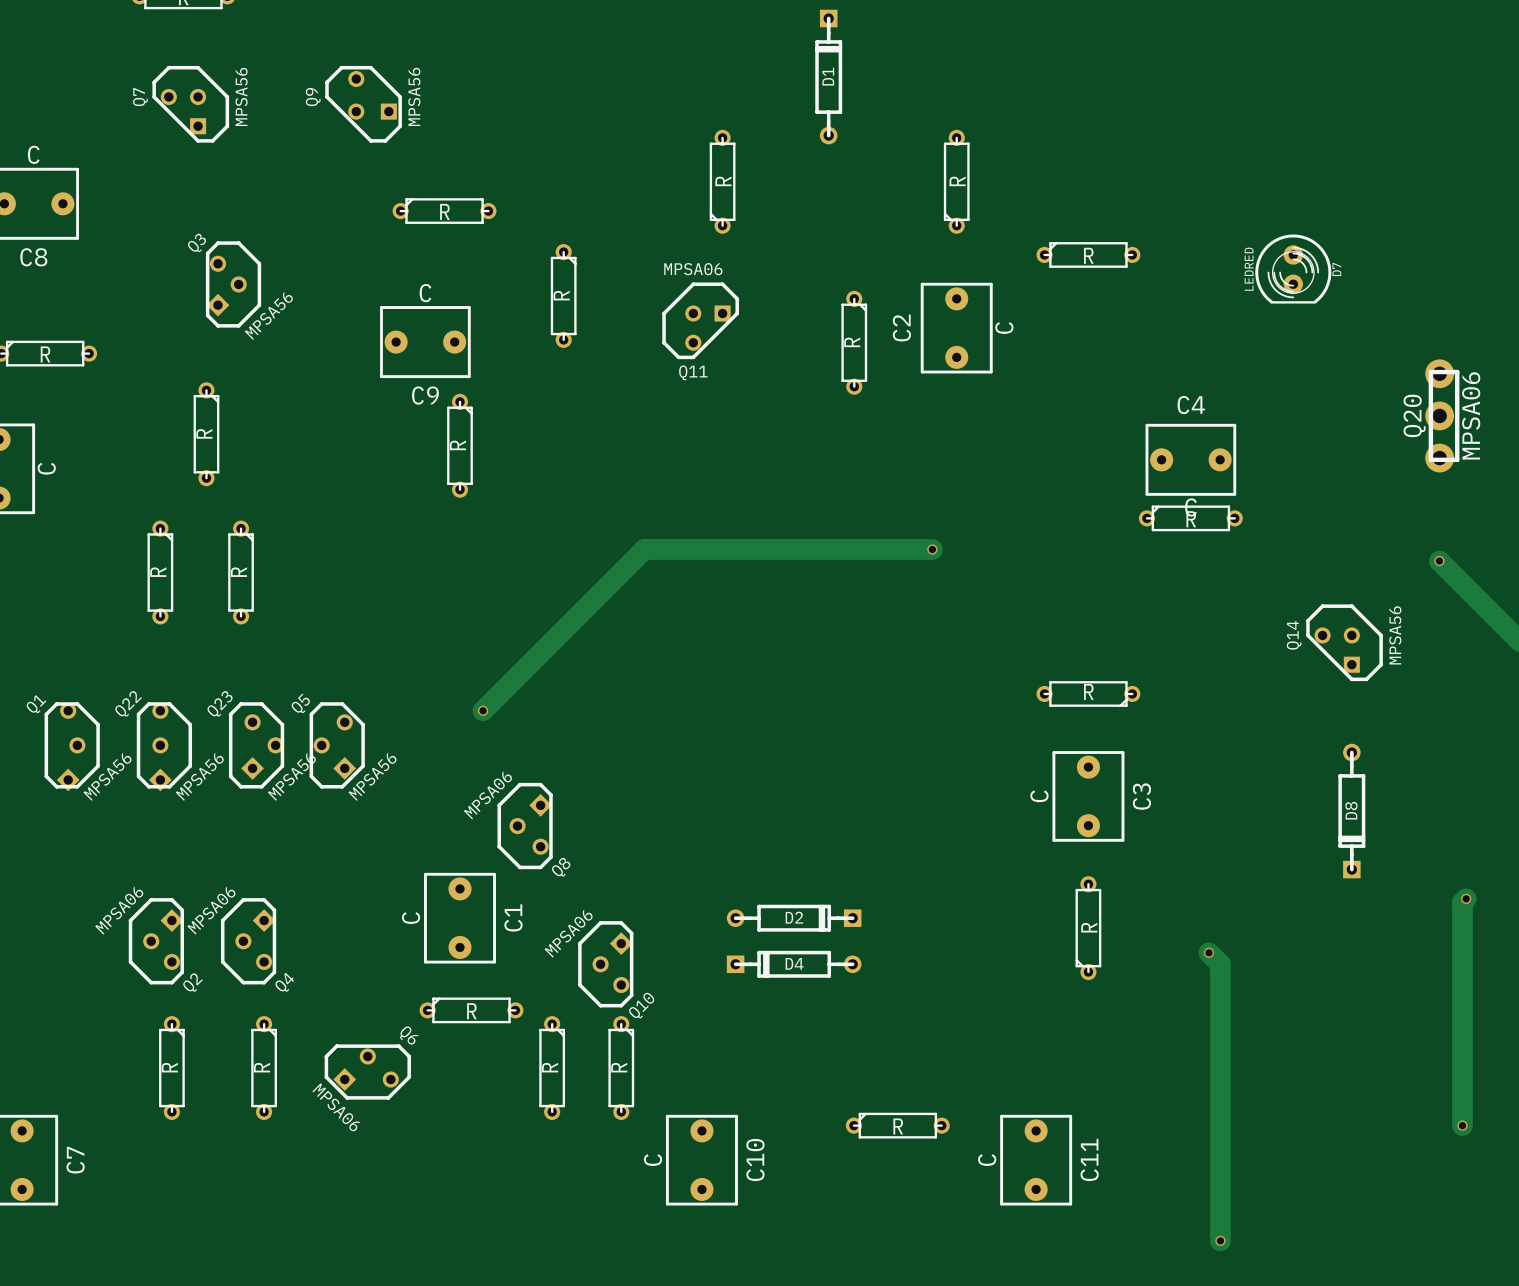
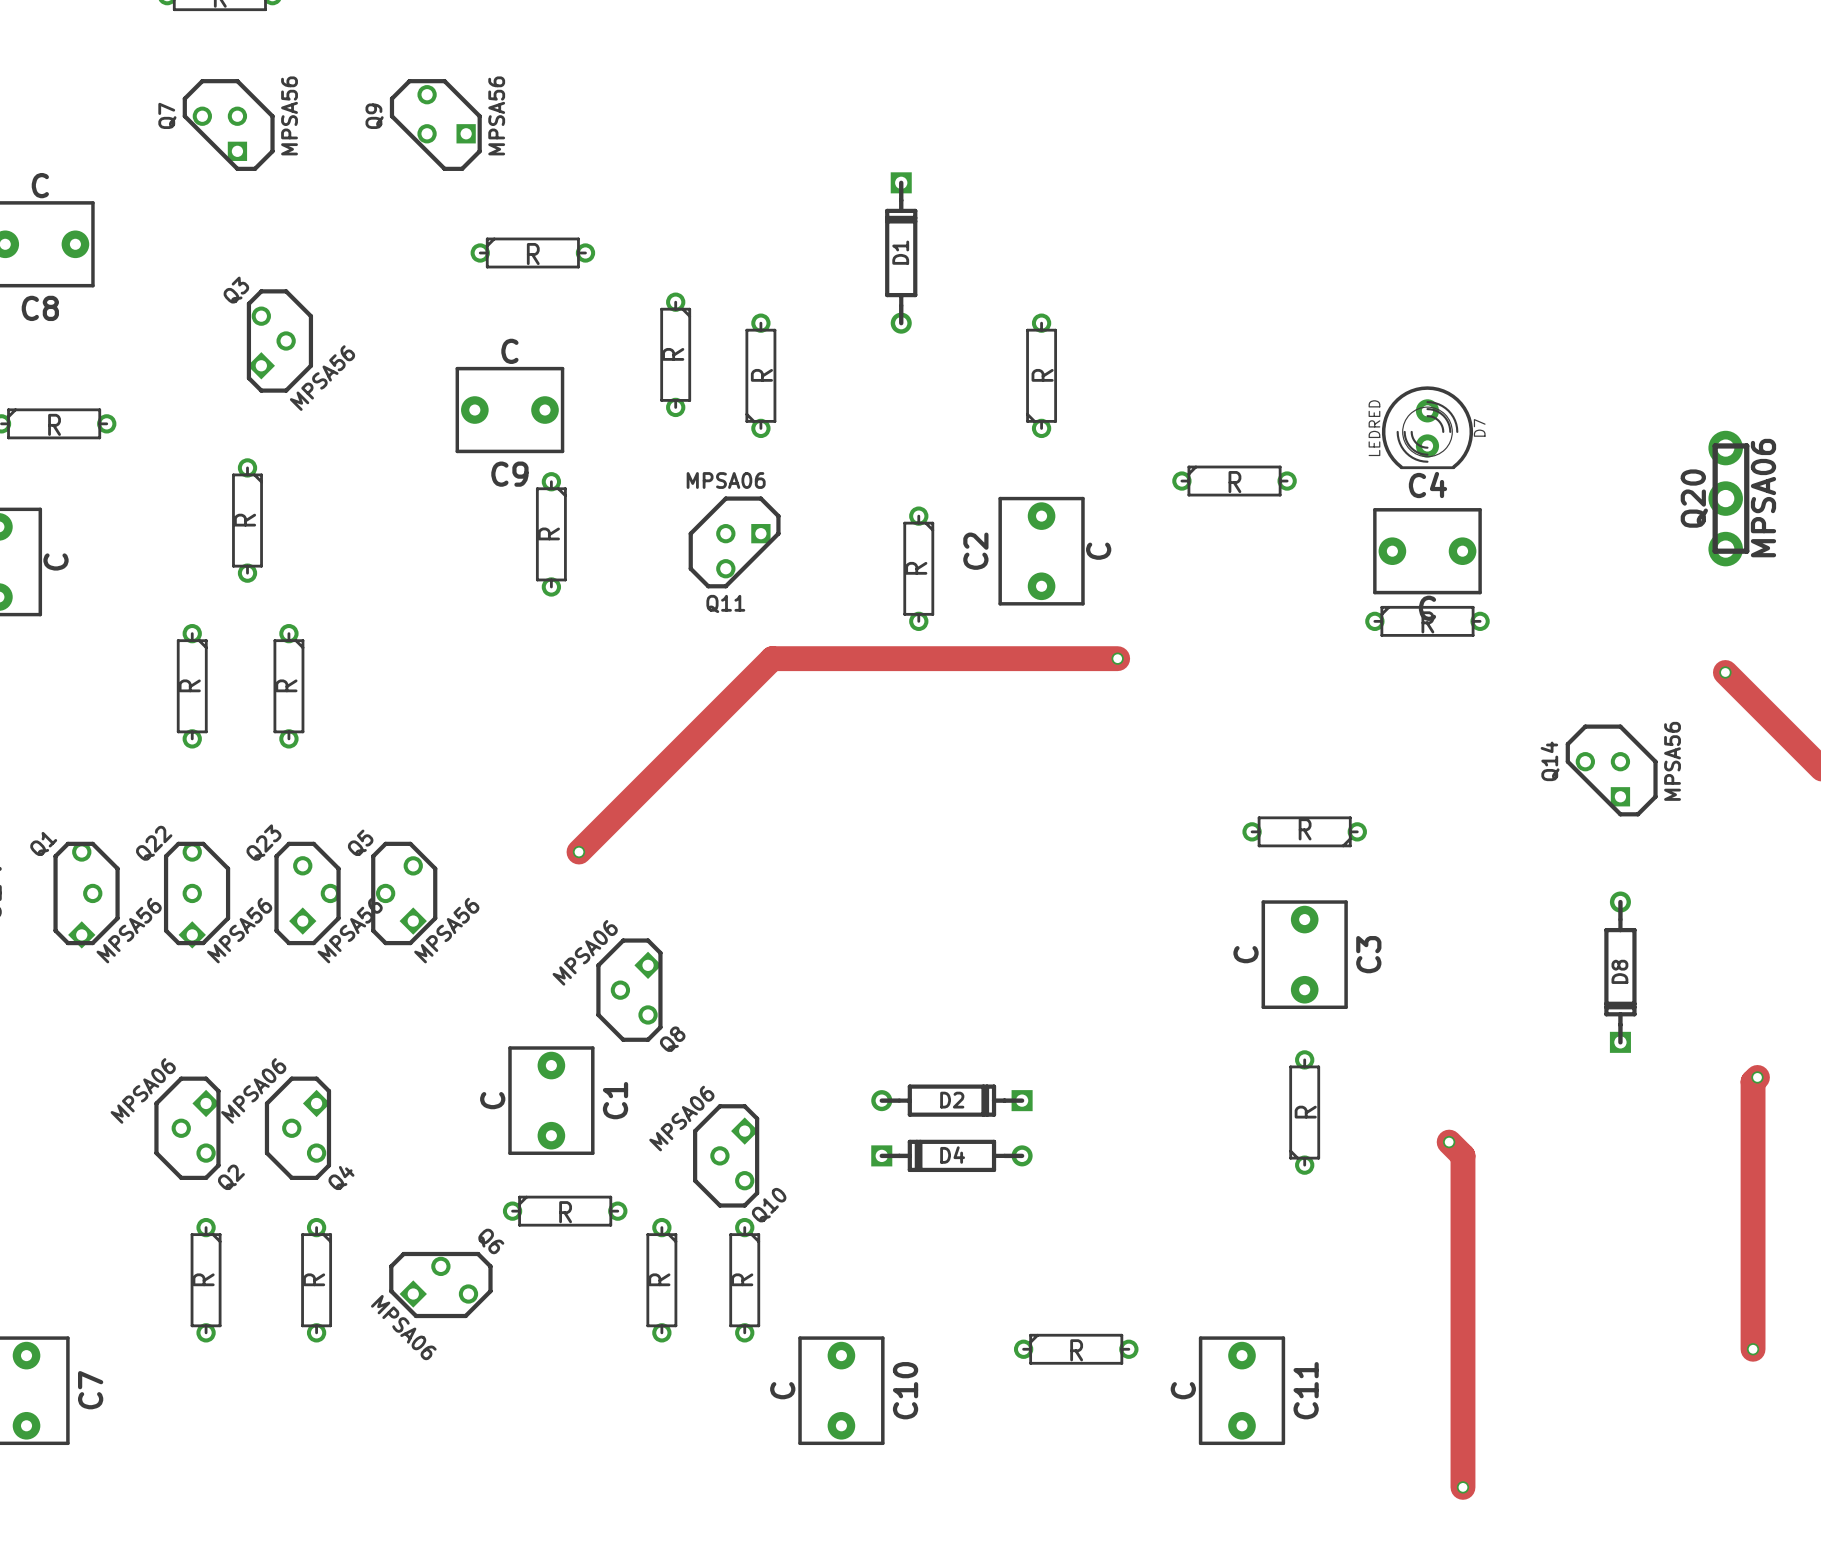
D1 position: (828, 77) -> (901, 252)
part: R (722, 181) -> none
part: R (956, 181) -> none
part: R (1088, 254) -> none
D7 position: (1293, 269) -> (1427, 427)
part: none -> R (760, 375)
Q11 position: (700, 320) -> (734, 542)
C2 position: (956, 328) -> (1041, 551)
part rotation: 0° (854, 342) -> 180° (1041, 375)
part: none -> R (1234, 481)
part: none -> R (918, 568)

